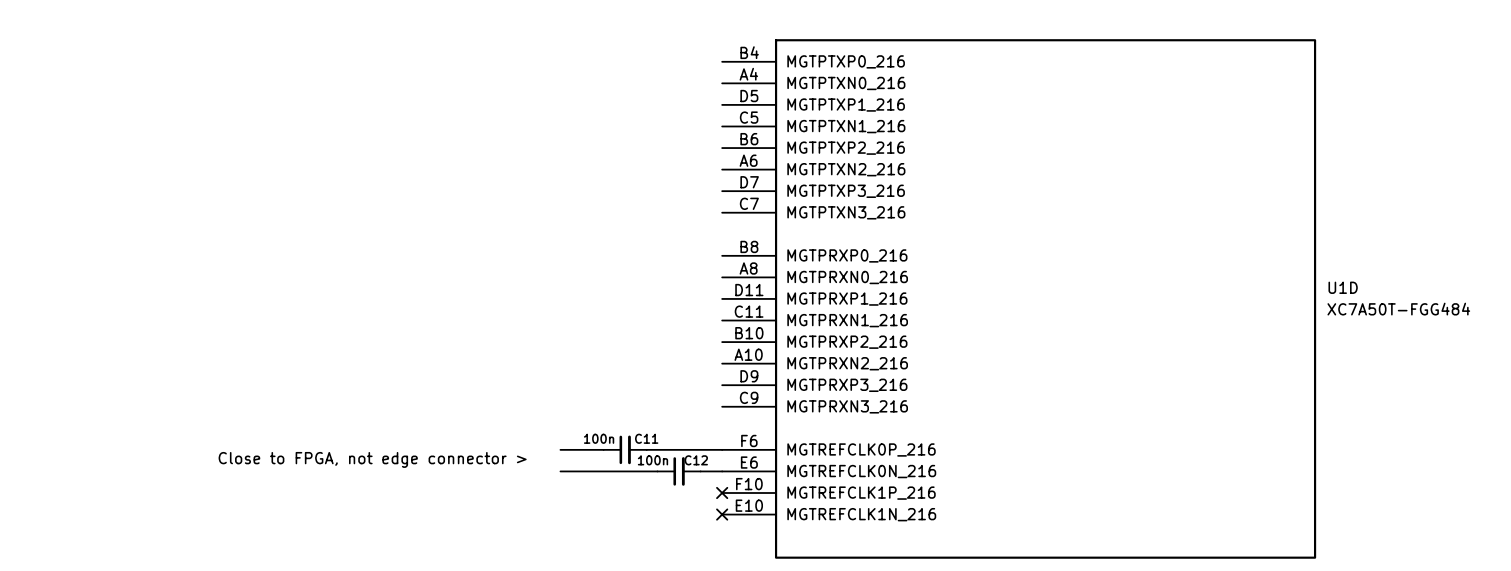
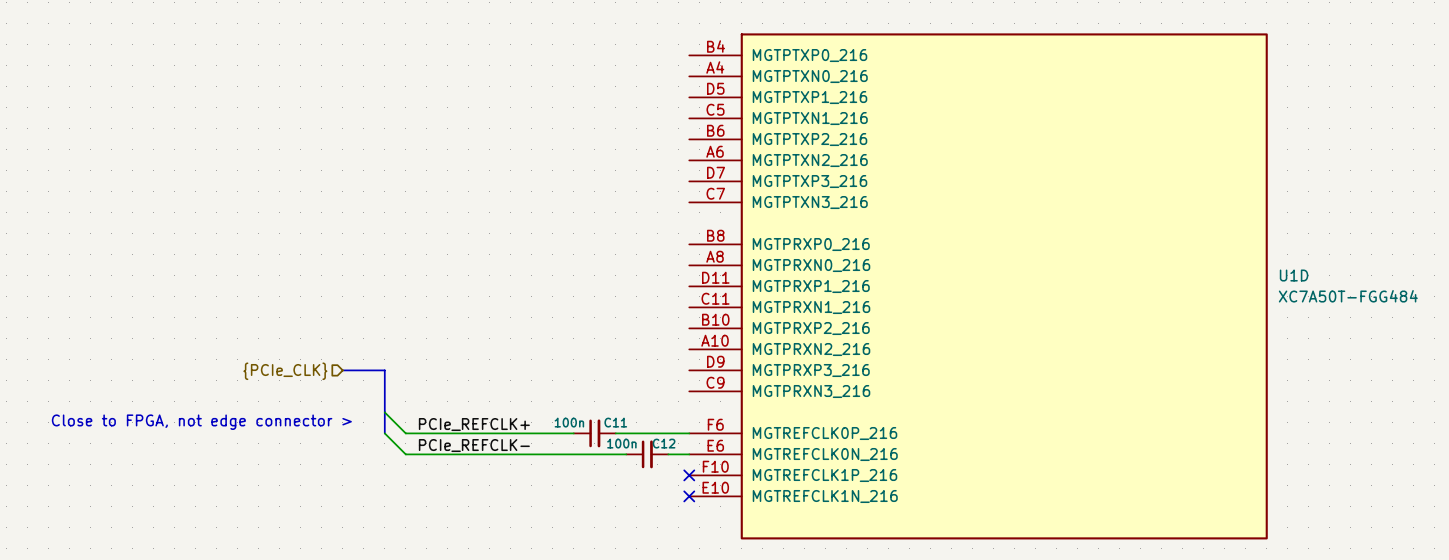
bus: none -> (342, 370) (384, 370) (384, 433)
hierarchical label: none -> {PCIe_CLK} (285, 371)
wire: none -> (384, 412) (405, 433) (531, 433)
label: none -> PCIe_REFCLK+ (474, 424)
wire: none -> (384, 433) (405, 454) (531, 454)
text position: Close to FPGA, not edge connector > (372, 459) -> Close to FPGA, not edge connector > (201, 422)
label: none -> PCIe_REFCLK- (474, 445)

